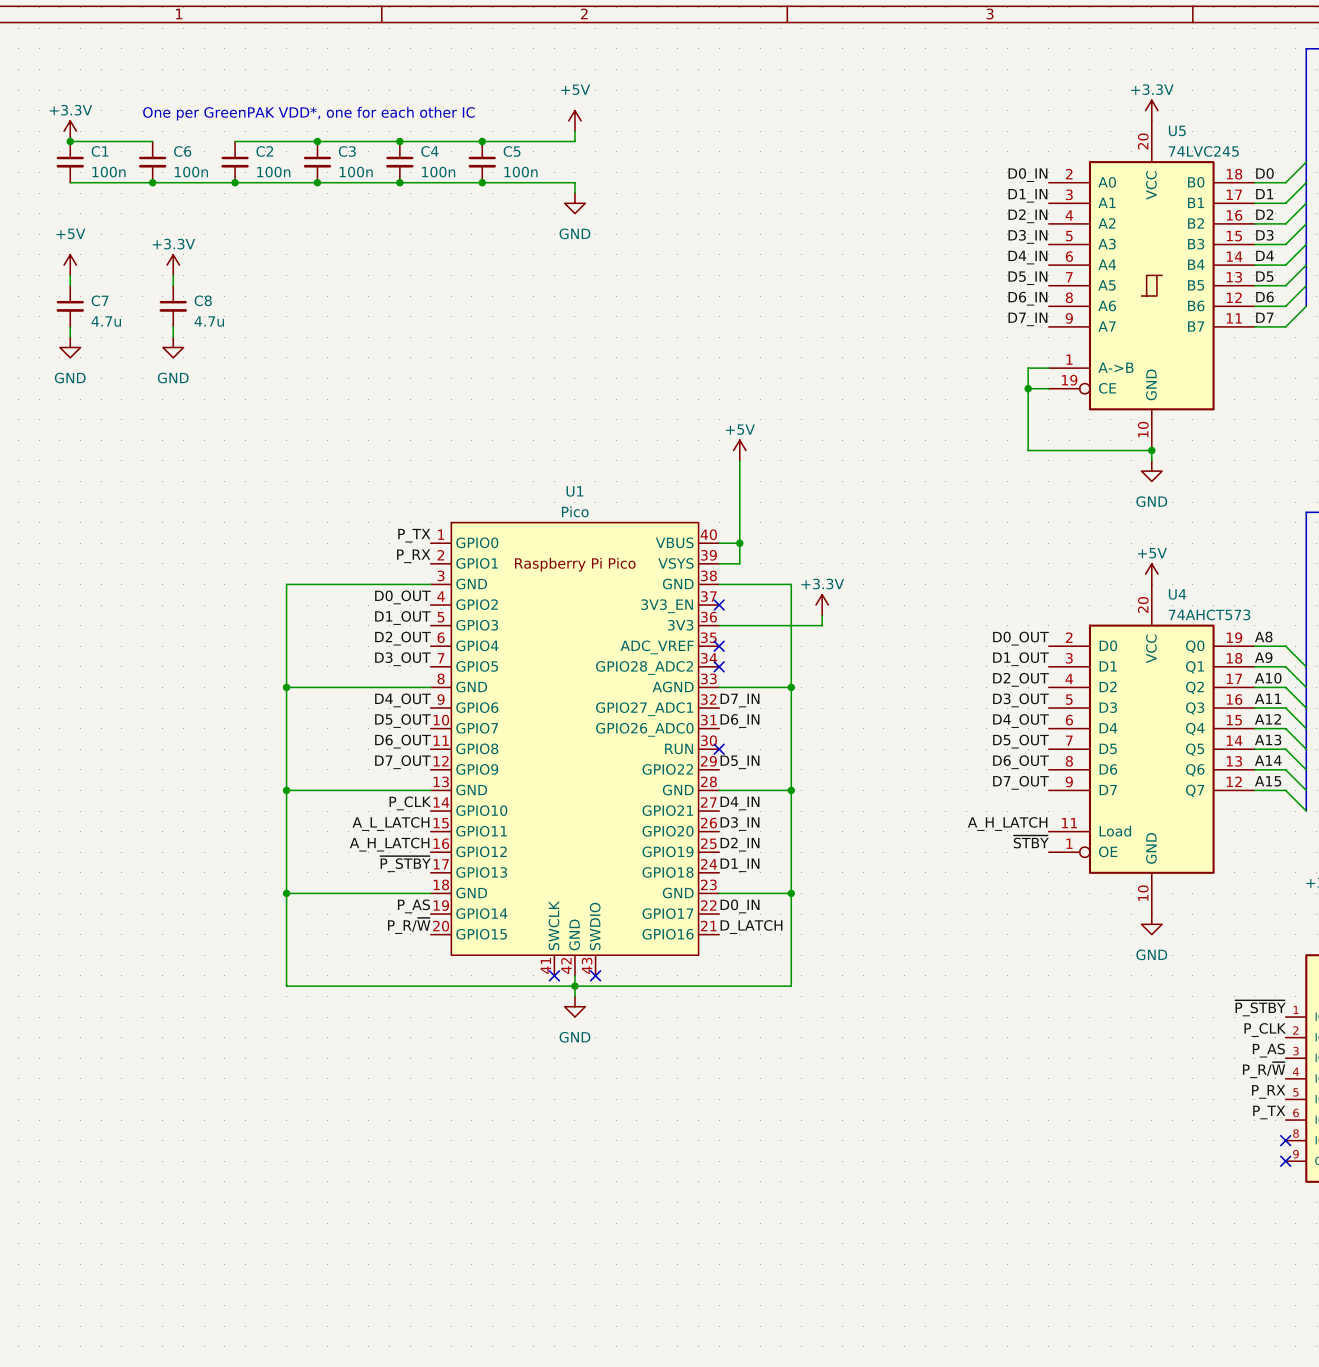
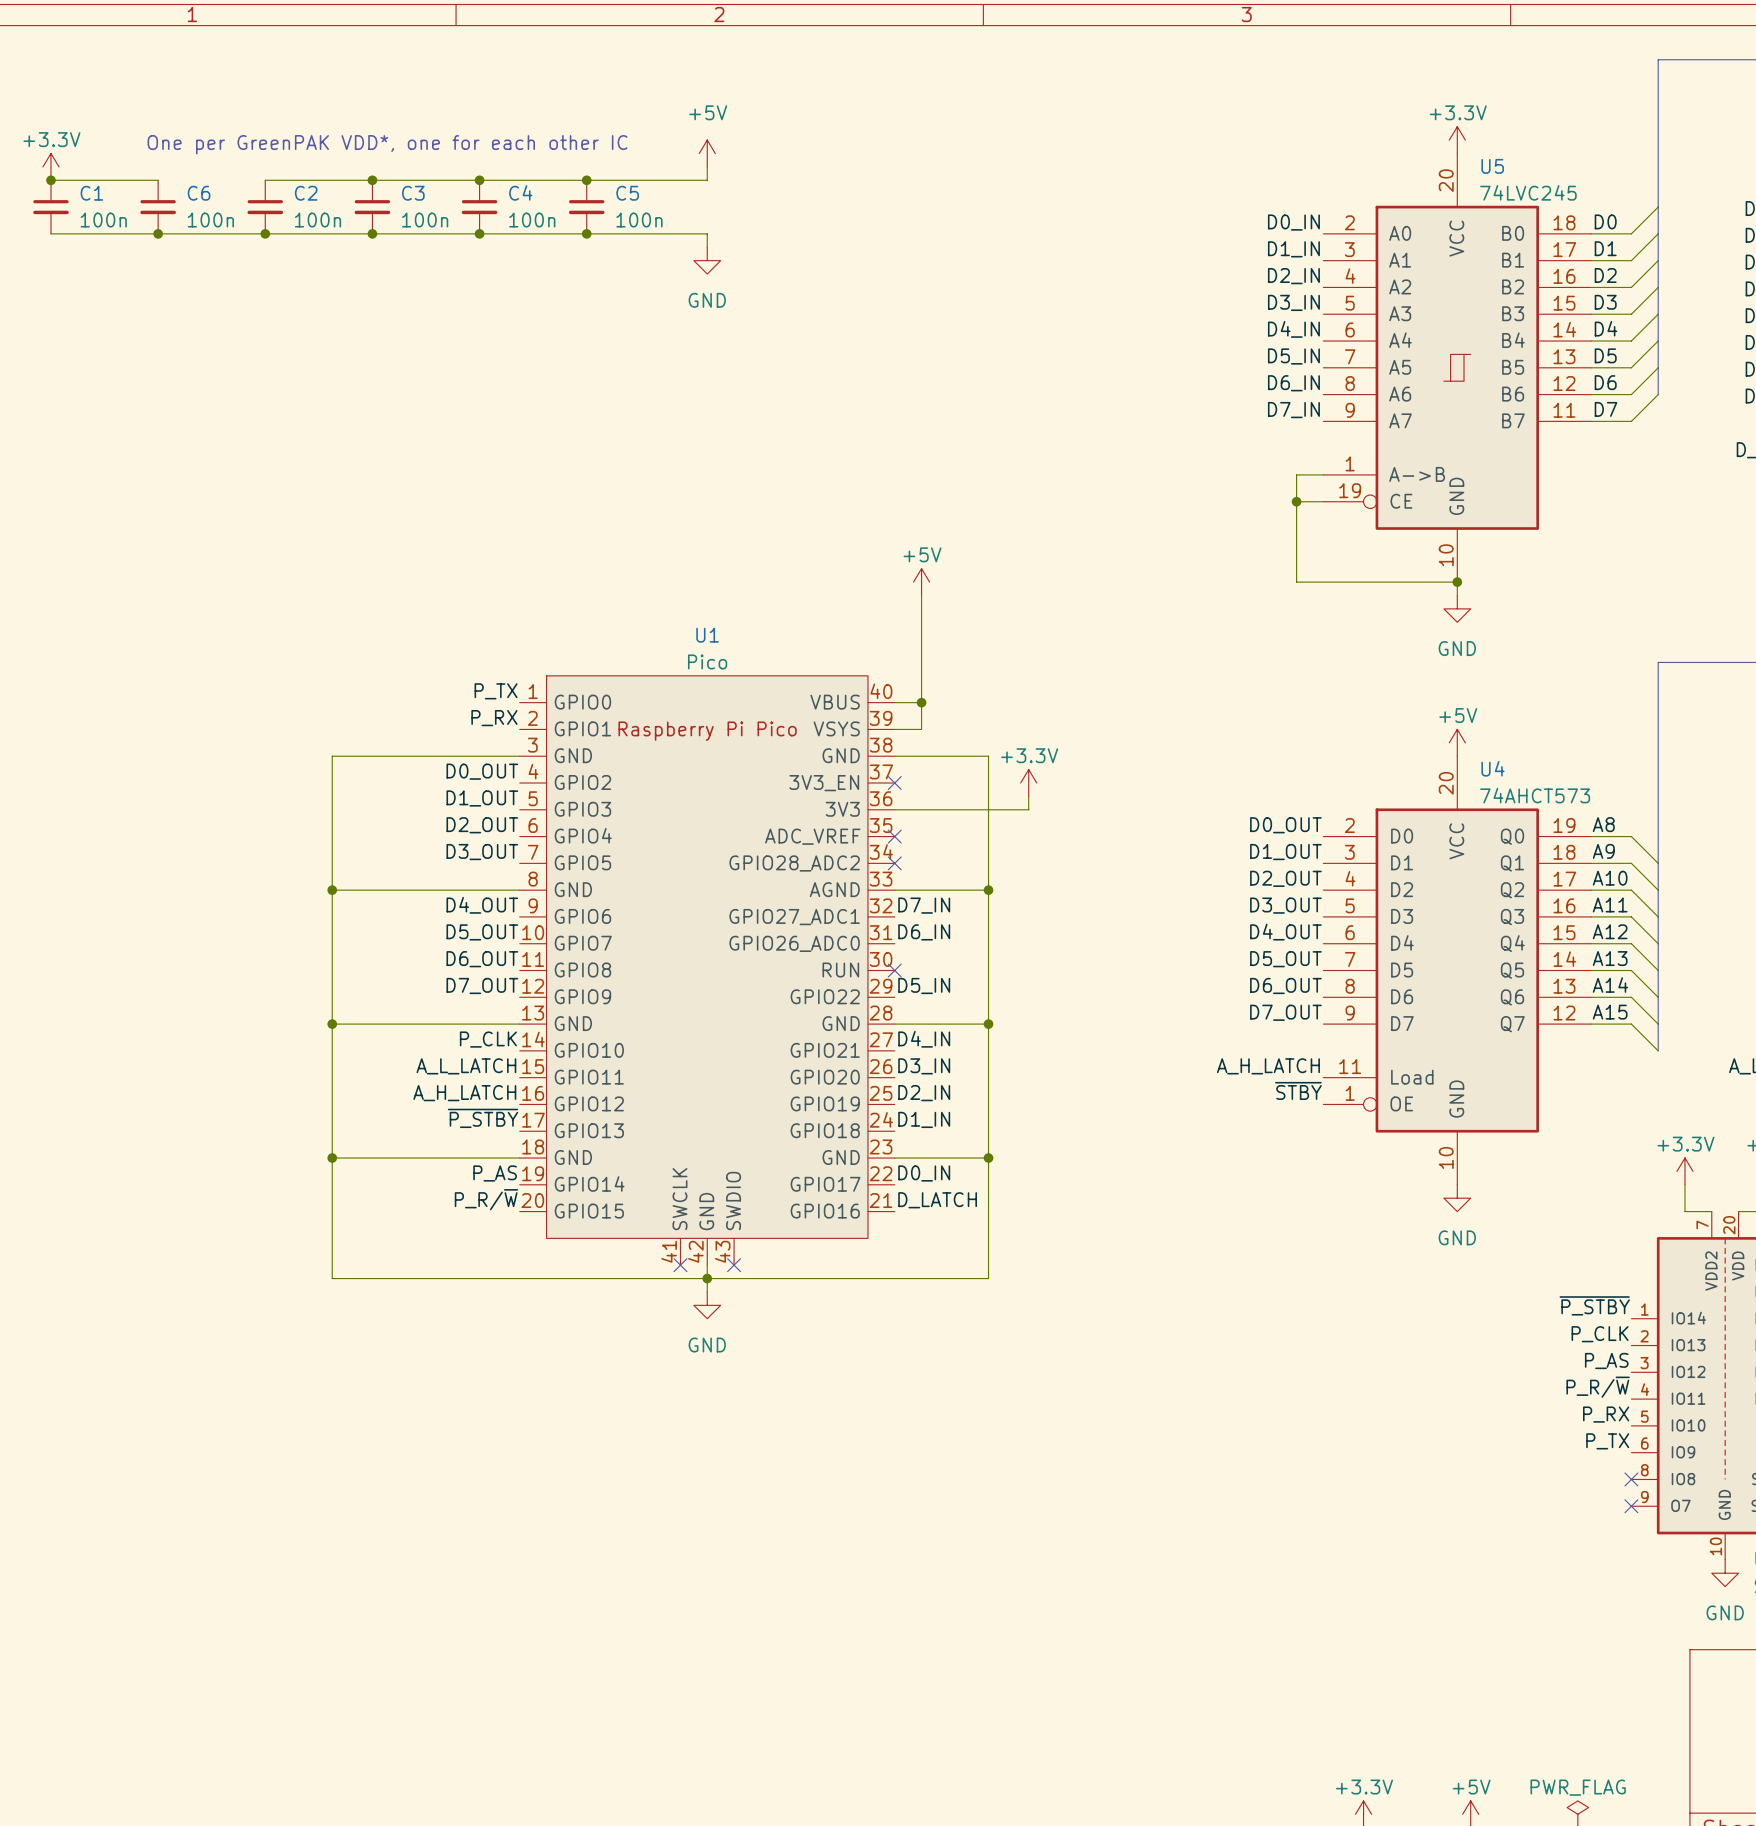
power symbol: +5V (70, 265) -> none
power symbol: +3.3V (173, 265) -> none
wire: (70, 275) (70, 285) -> none
wire: (173, 275) (173, 285) -> none
C7: 4.7u (70, 306) -> none
C8: 4.7u (173, 306) -> none
wire: (70, 326) (70, 337) -> none
wire: (173, 326) (173, 337) -> none
power symbol: GND (70, 347) -> none
power symbol: GND (173, 347) -> none

